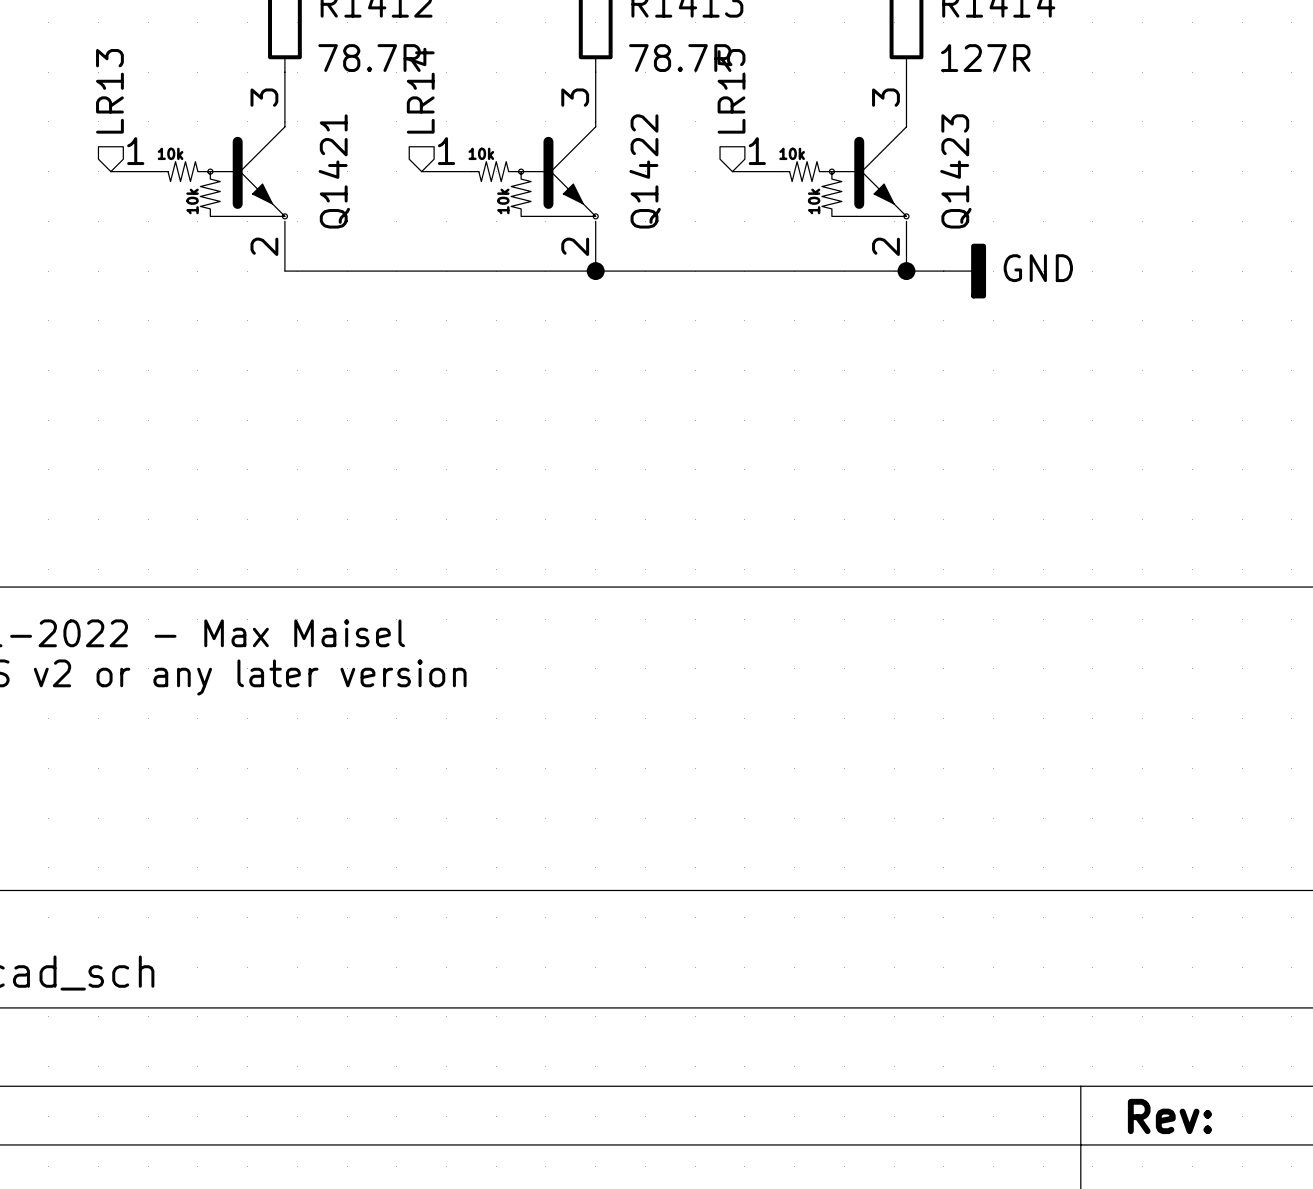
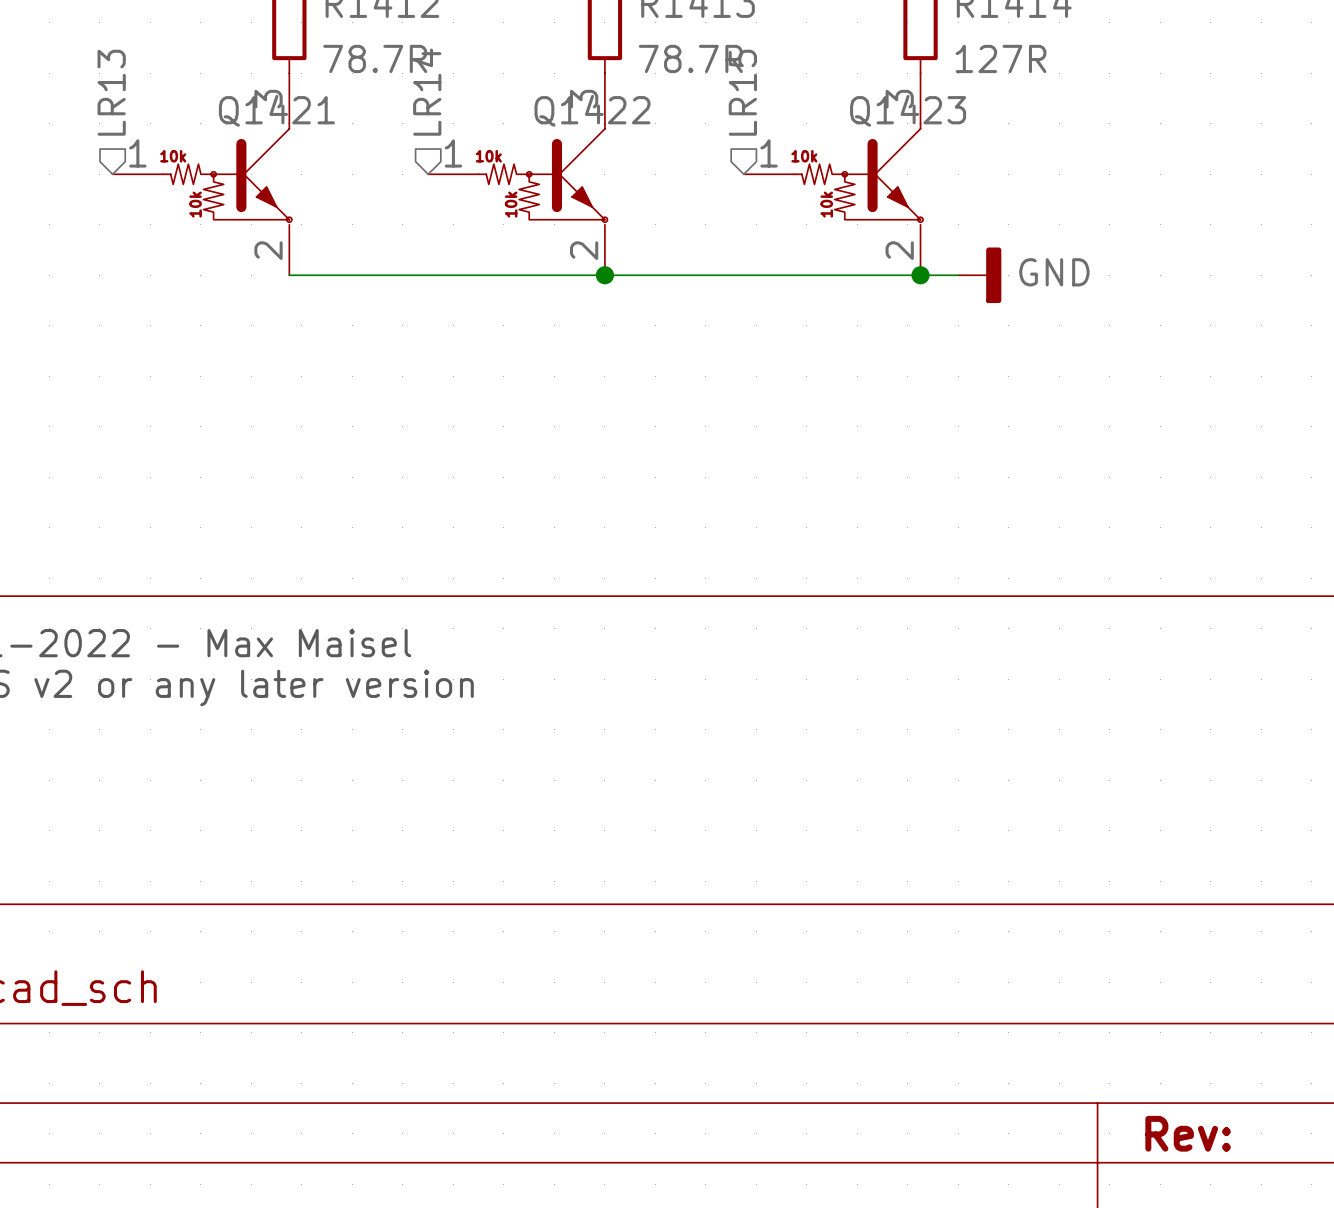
Q1421 name rotation: 0° (334, 171) -> 90° clockwise (276, 110)
Q1422 name rotation: 0° (645, 171) -> 90° clockwise (592, 110)
Q1423 name rotation: 0° (955, 171) -> 90° clockwise (908, 110)

